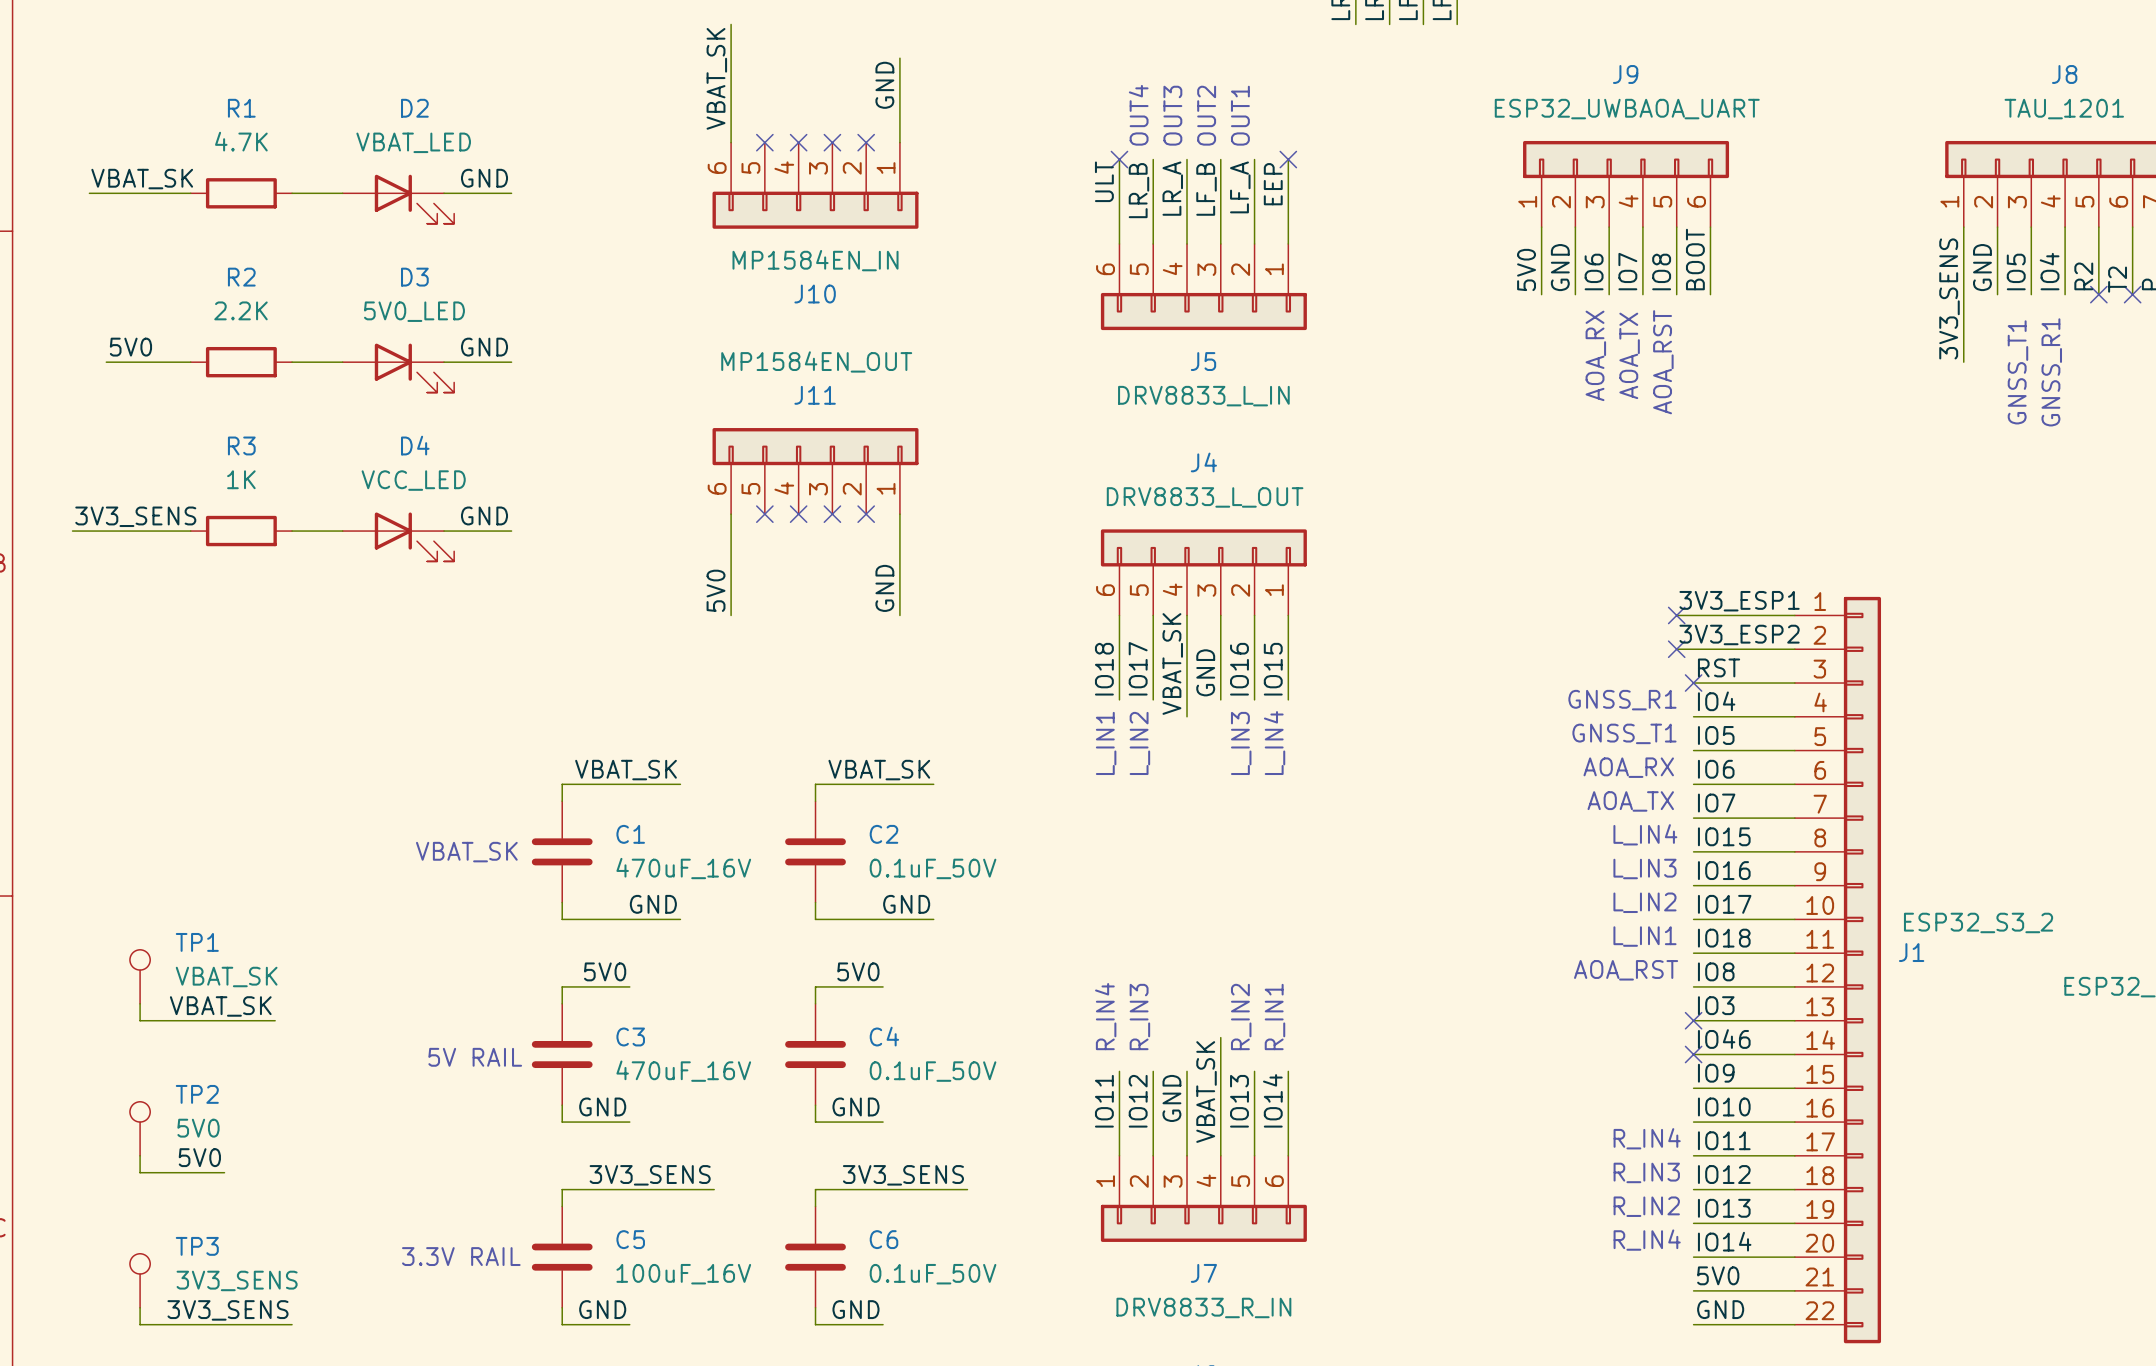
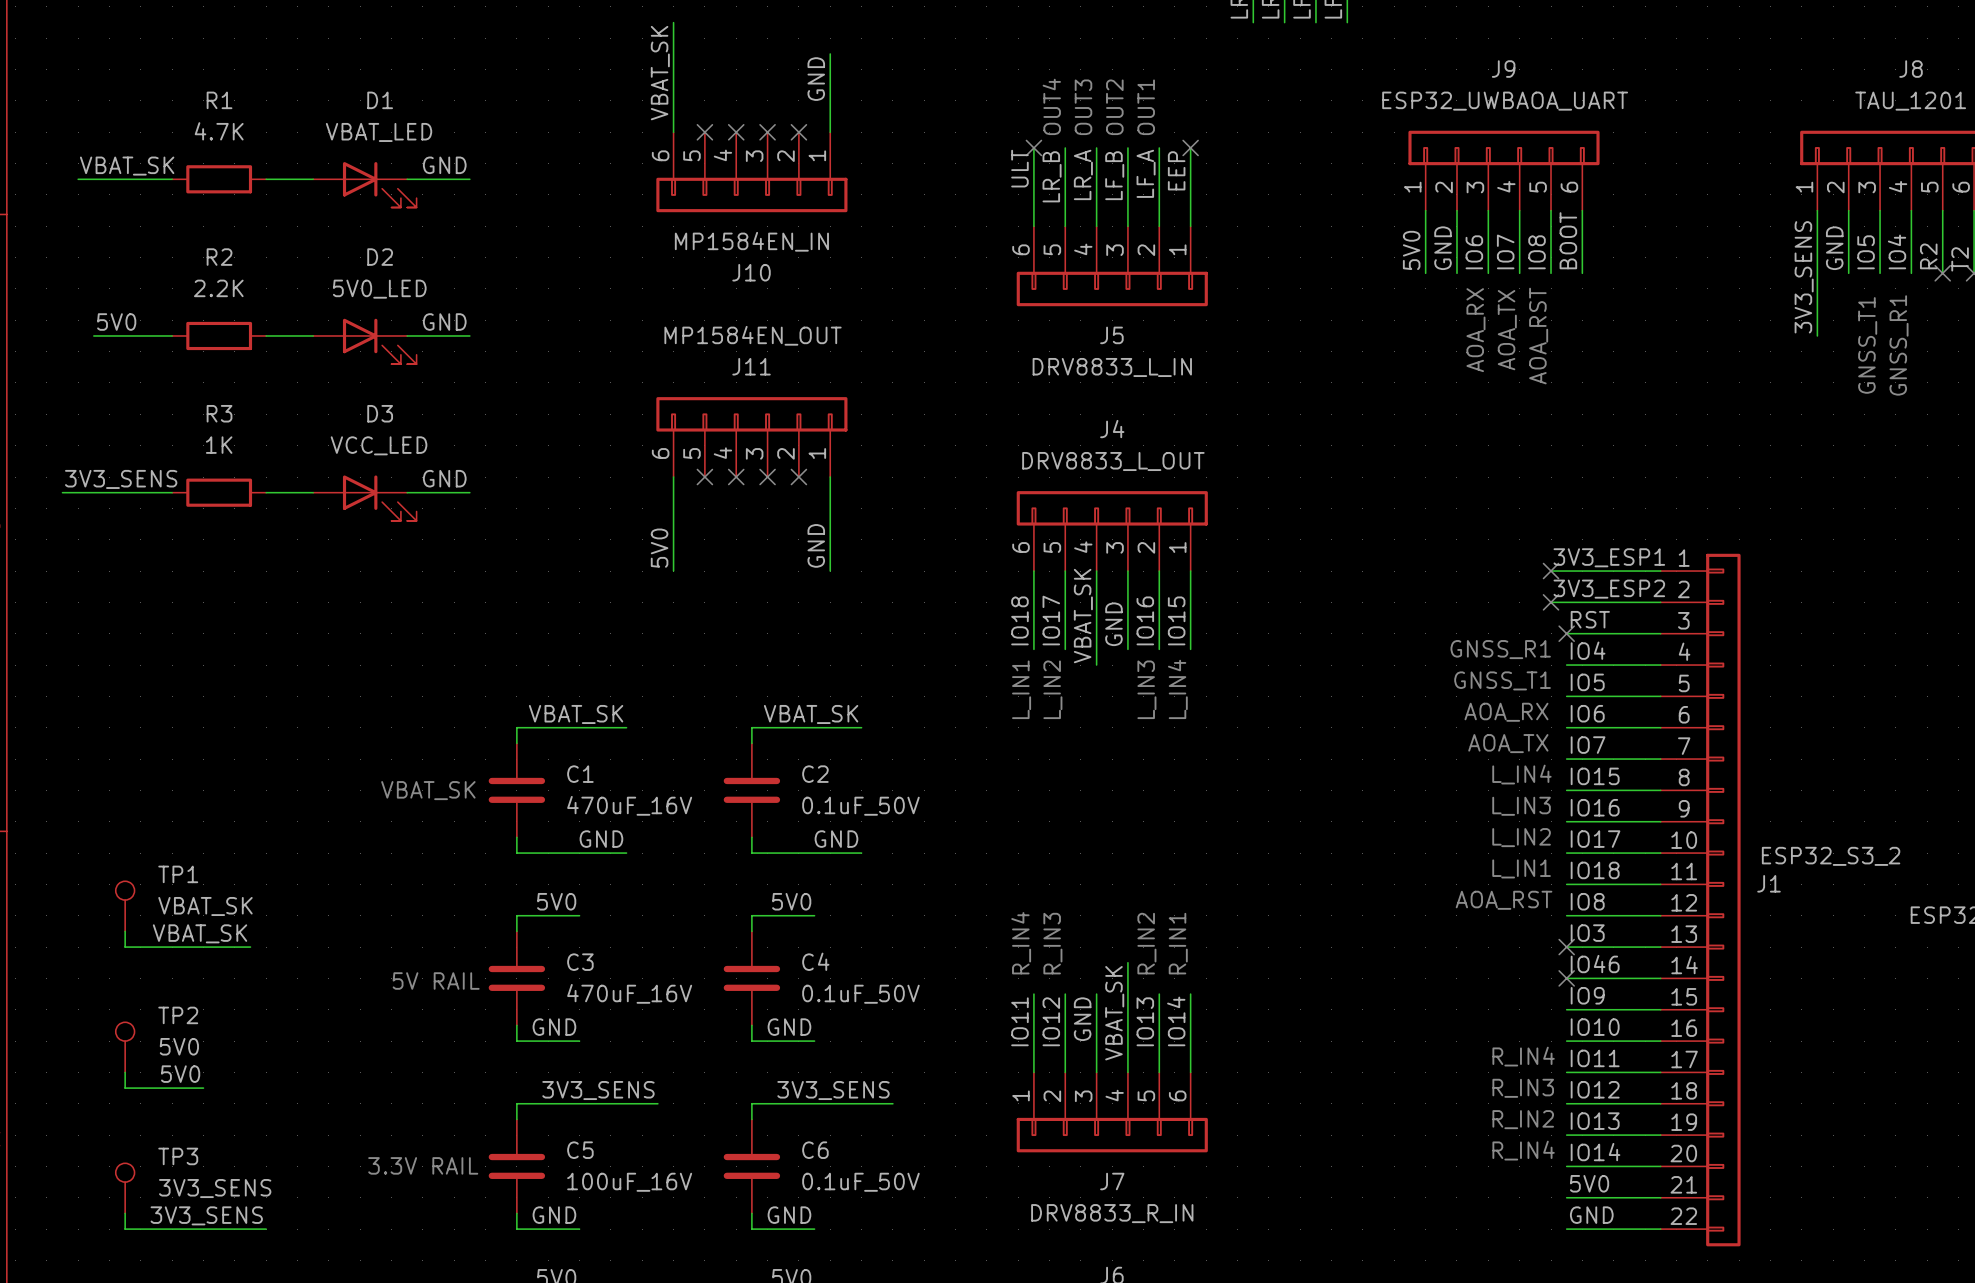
D2 name: D2 (414, 108) -> D1 (380, 100)
D3 name: D3 (414, 277) -> D2 (380, 257)
D4 name: D4 (415, 445) -> D3 (380, 413)

